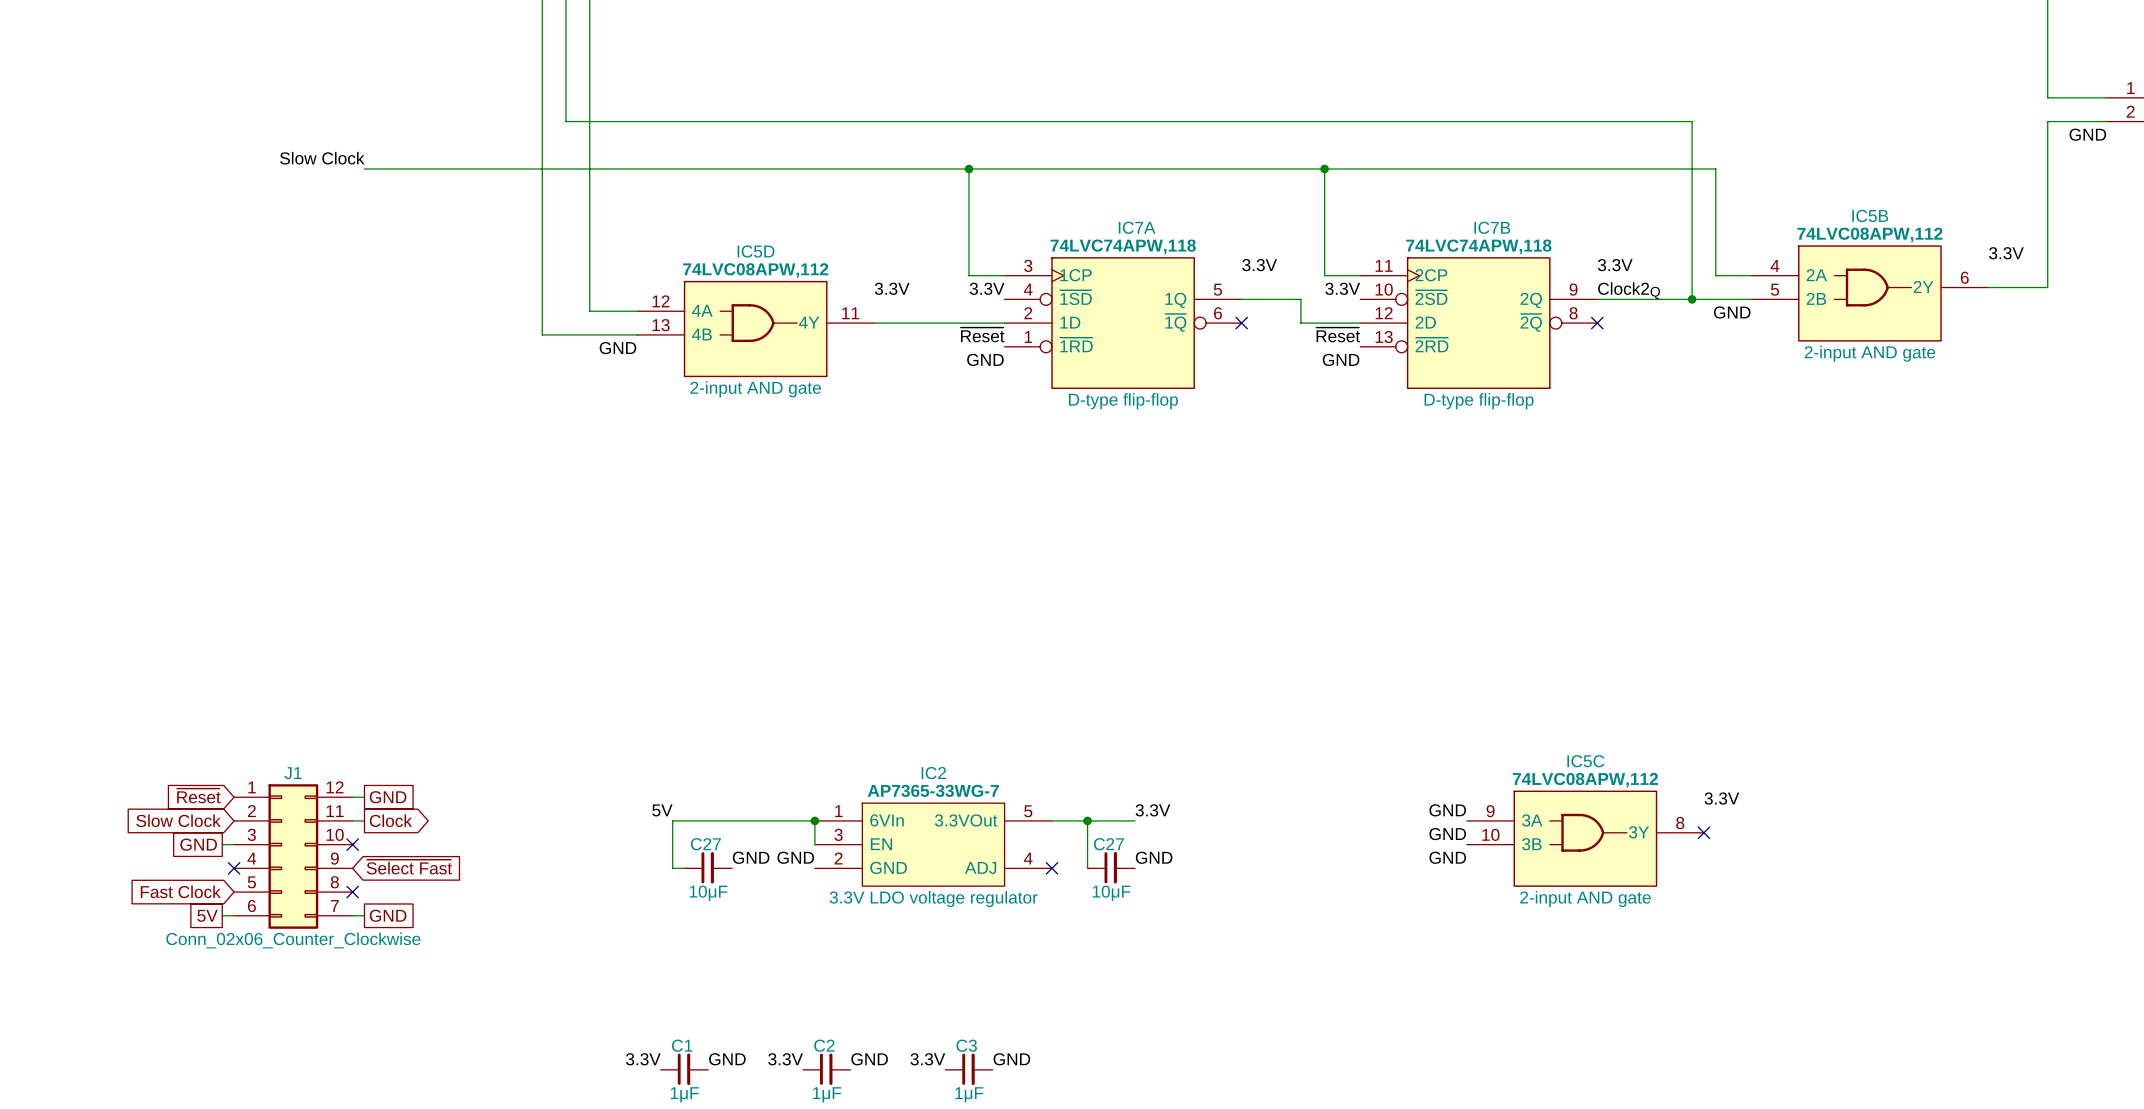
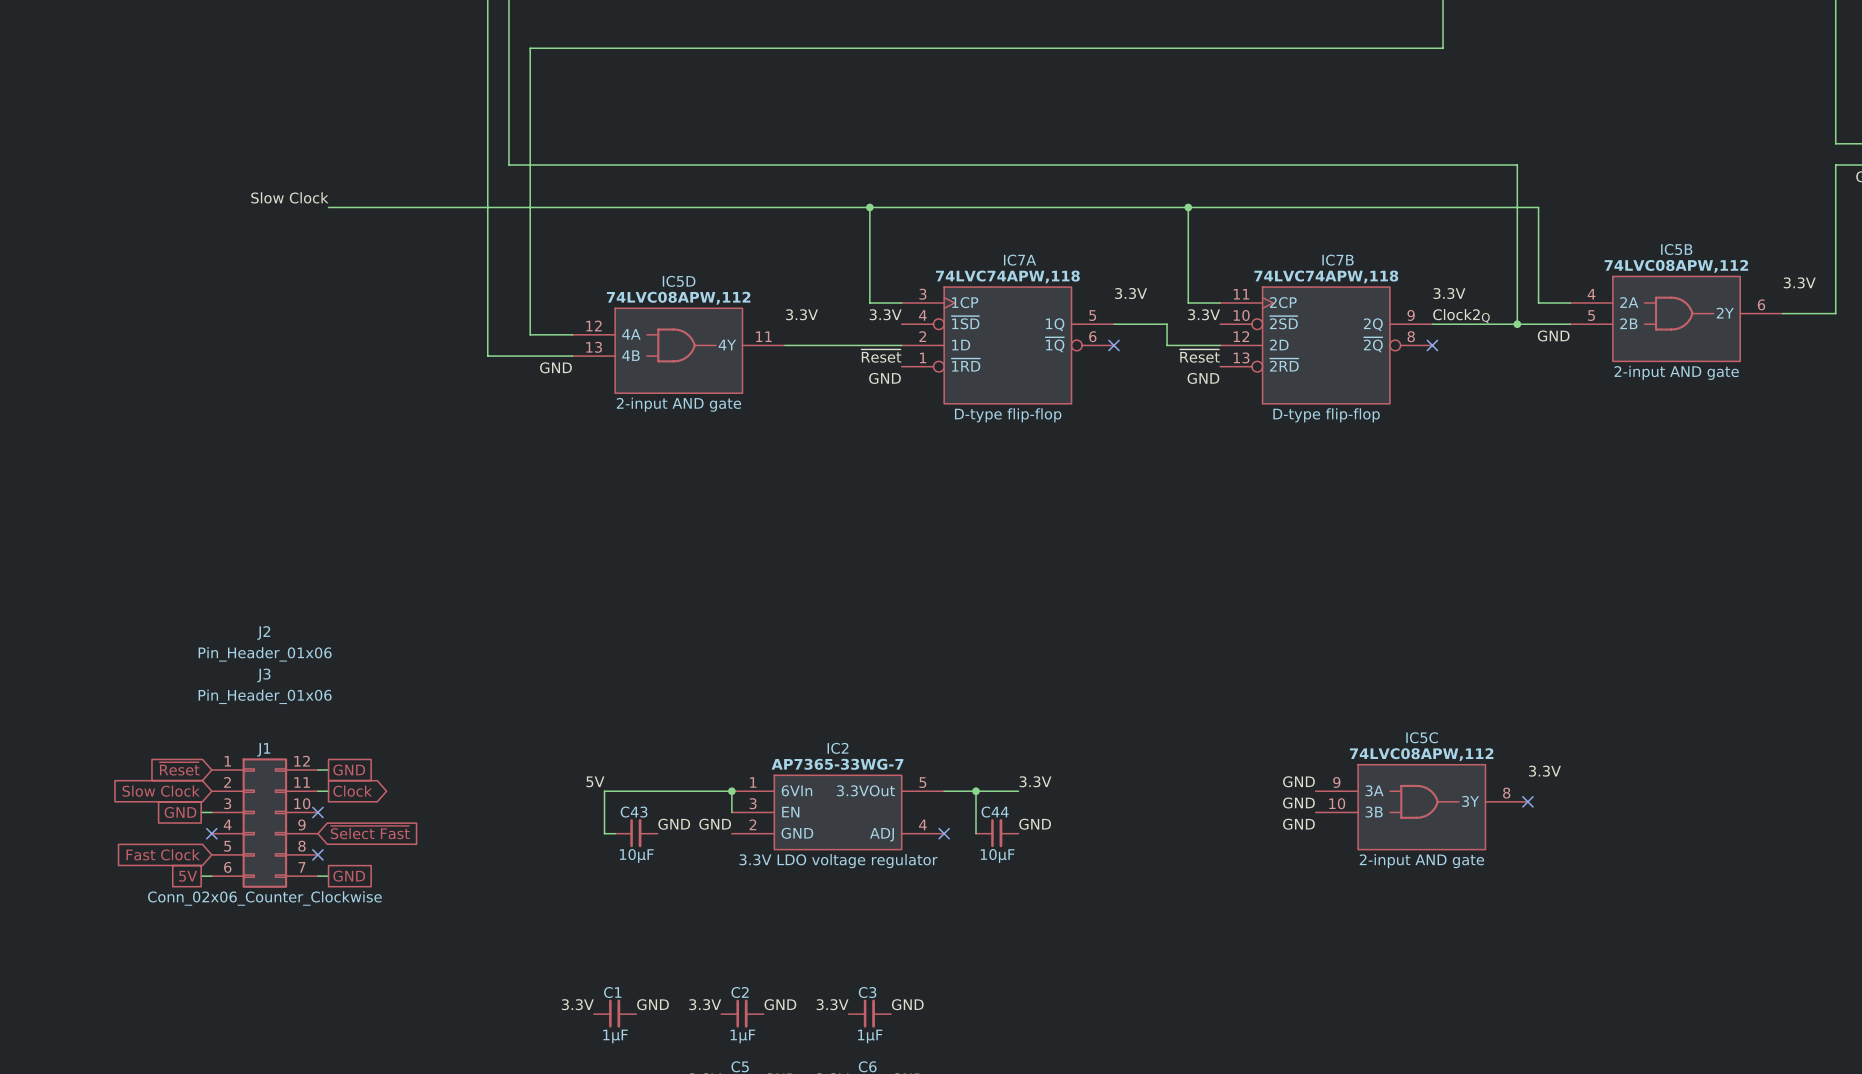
J2: none -> Pin_Header_01x06 (265, 643)
J3: none -> Pin_Header_01x06 (265, 686)
C27 name: C27 (705, 844) -> C43 (634, 812)
C27 name: C27 (1108, 844) -> C44 (995, 812)

